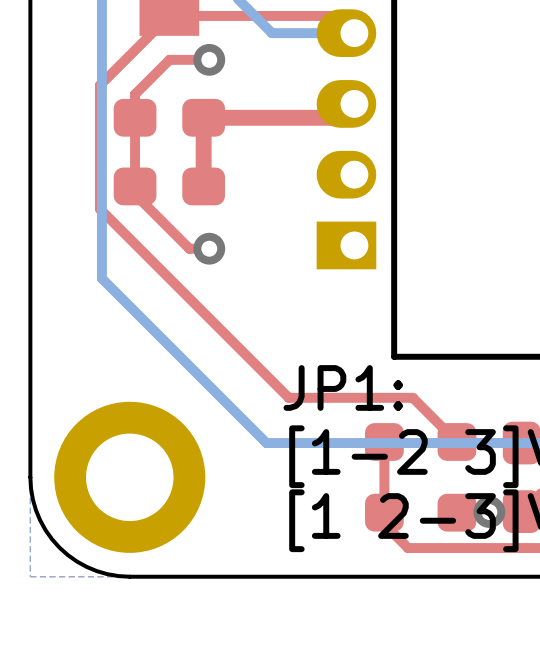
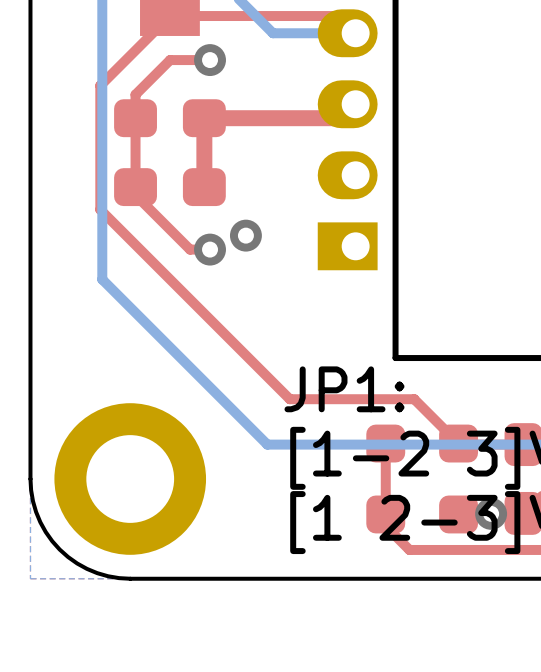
via: none -> (245, 235)

